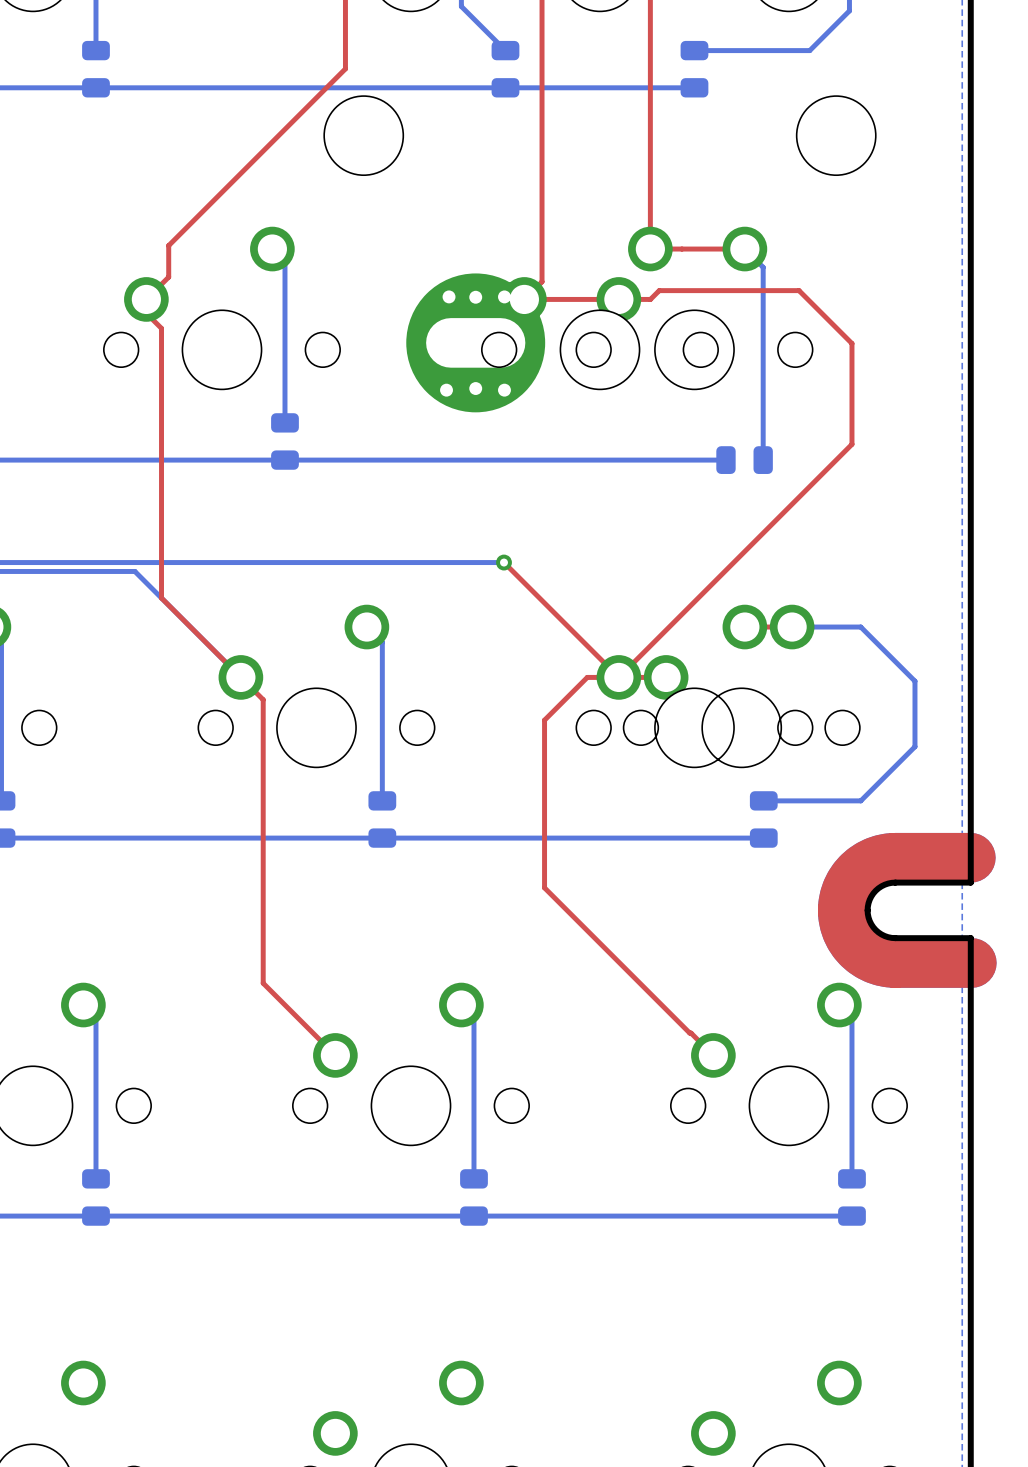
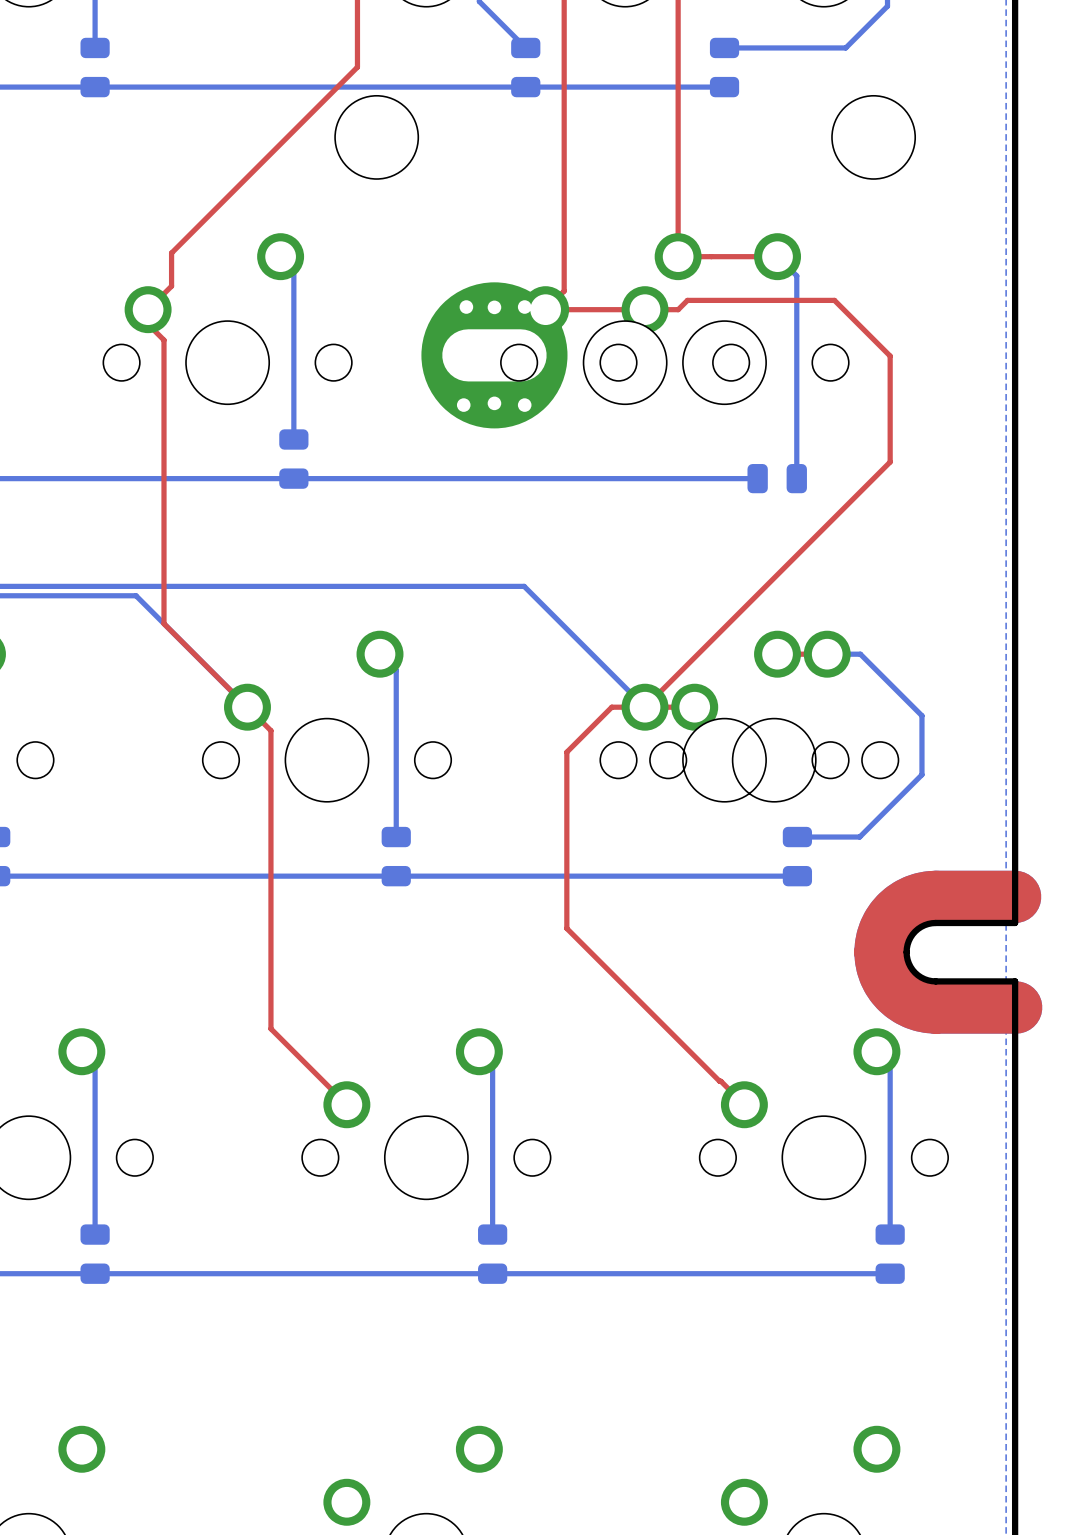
bottom track: none -> (524, 586) (645, 707)
top track: (503, 562) (618, 677) -> none
via: (503, 562) -> none
bottom track: (823, 627) (860, 627) (914, 681) (914, 746) (860, 800) (823, 800) -> (860, 654) (921, 715) (921, 774) (859, 837)

